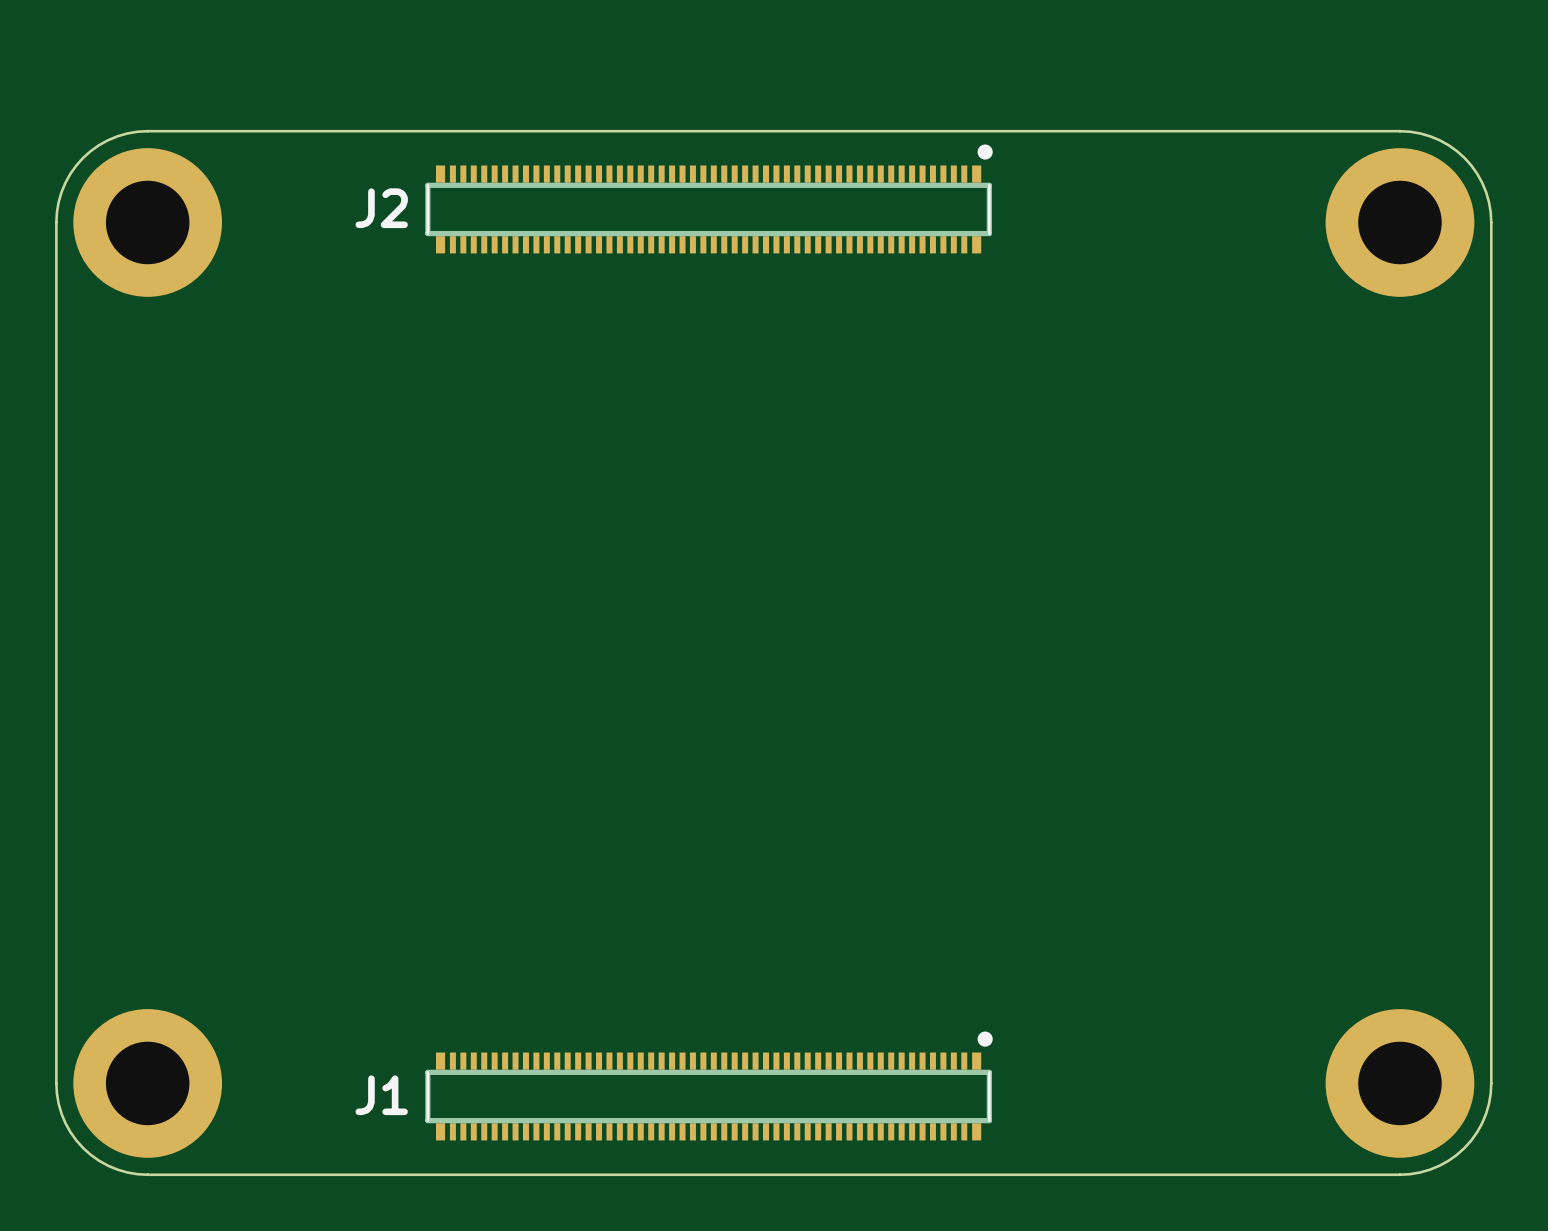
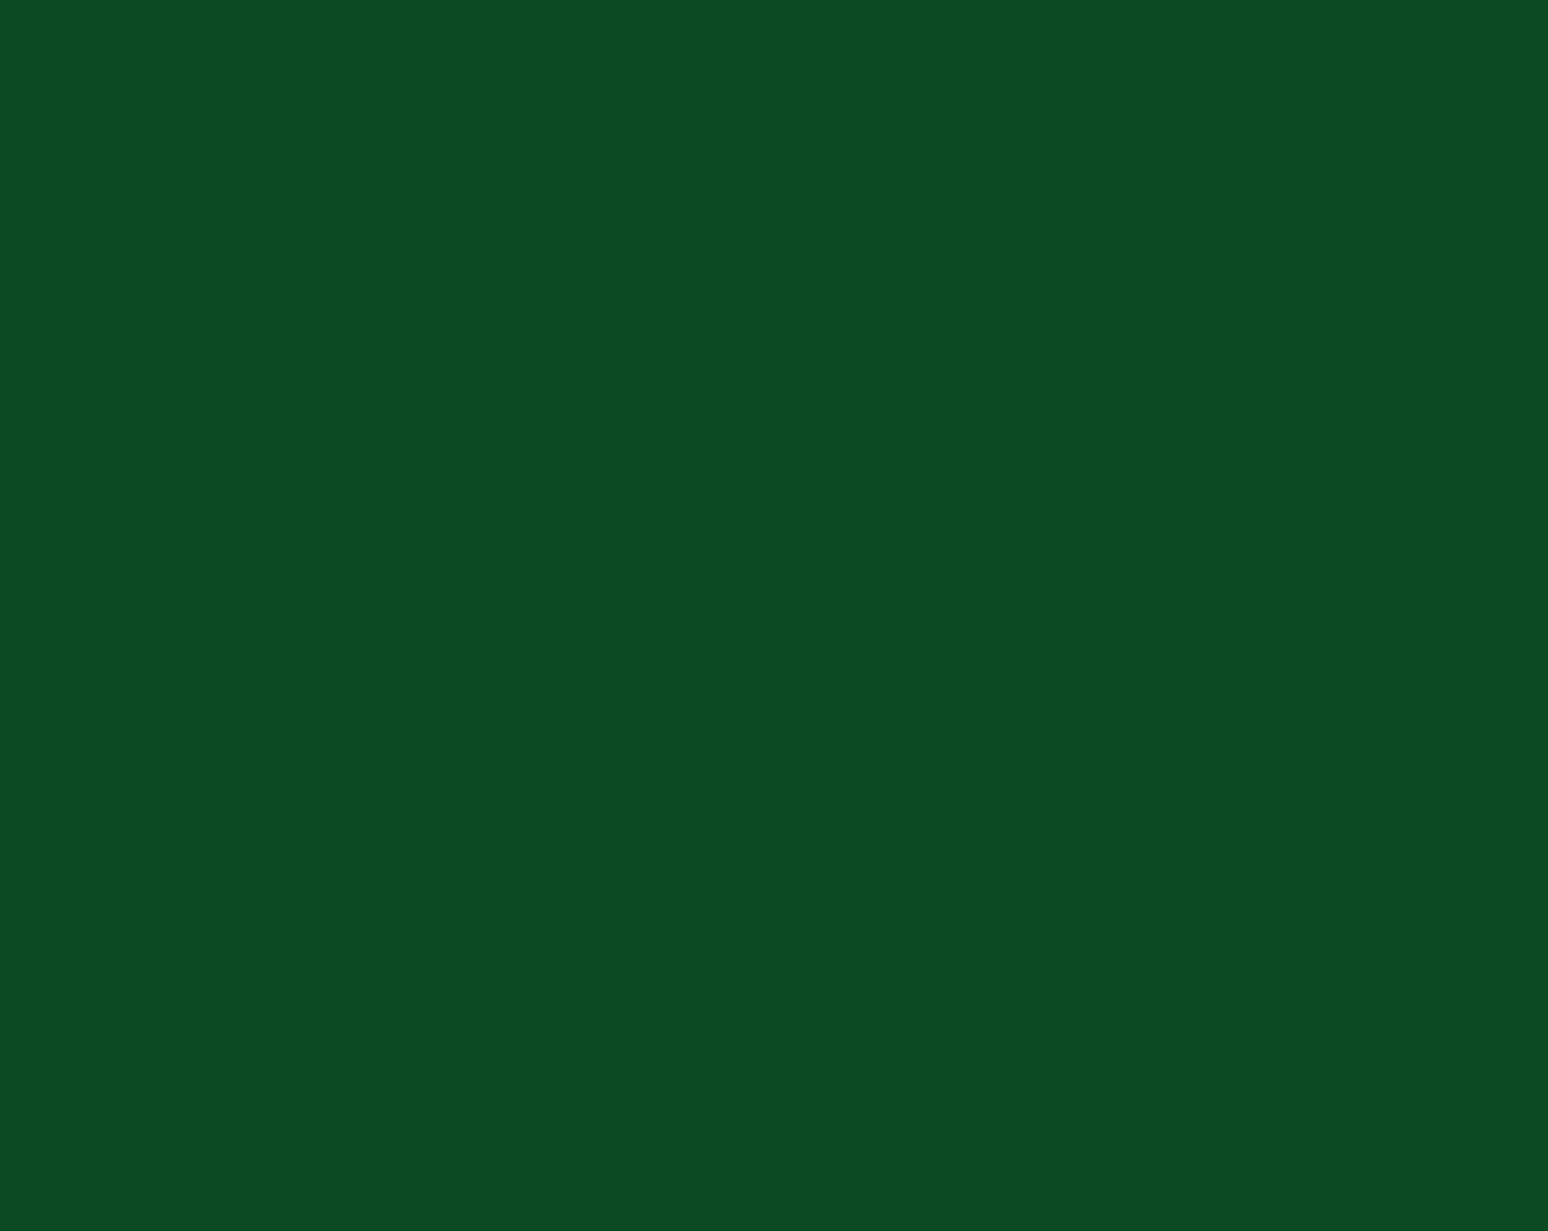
board edge: (1399, 131) (147, 131) (117, 136) (90, 151) (76, 165) (65, 182) (58, 202) (56, 222) (56, 1083) (61, 1113) (76, 1140) (90, 1154) (108, 1165) (127, 1172) (147, 1174) (1399, 1174) (1430, 1169) (1456, 1154) (1471, 1140) (1482, 1123) (1488, 1103) (1491, 1083) (1491, 222) (1486, 192) (1477, 173) (1464, 157) (1448, 145) (1430, 136) (1399, 131) -> none
J2: (708, 198) -> none
part: (147, 222) -> none
part: (1399, 222) -> none
part: (147, 1083) -> none
part: (1399, 1083) -> none
J1: (708, 1085) -> none

